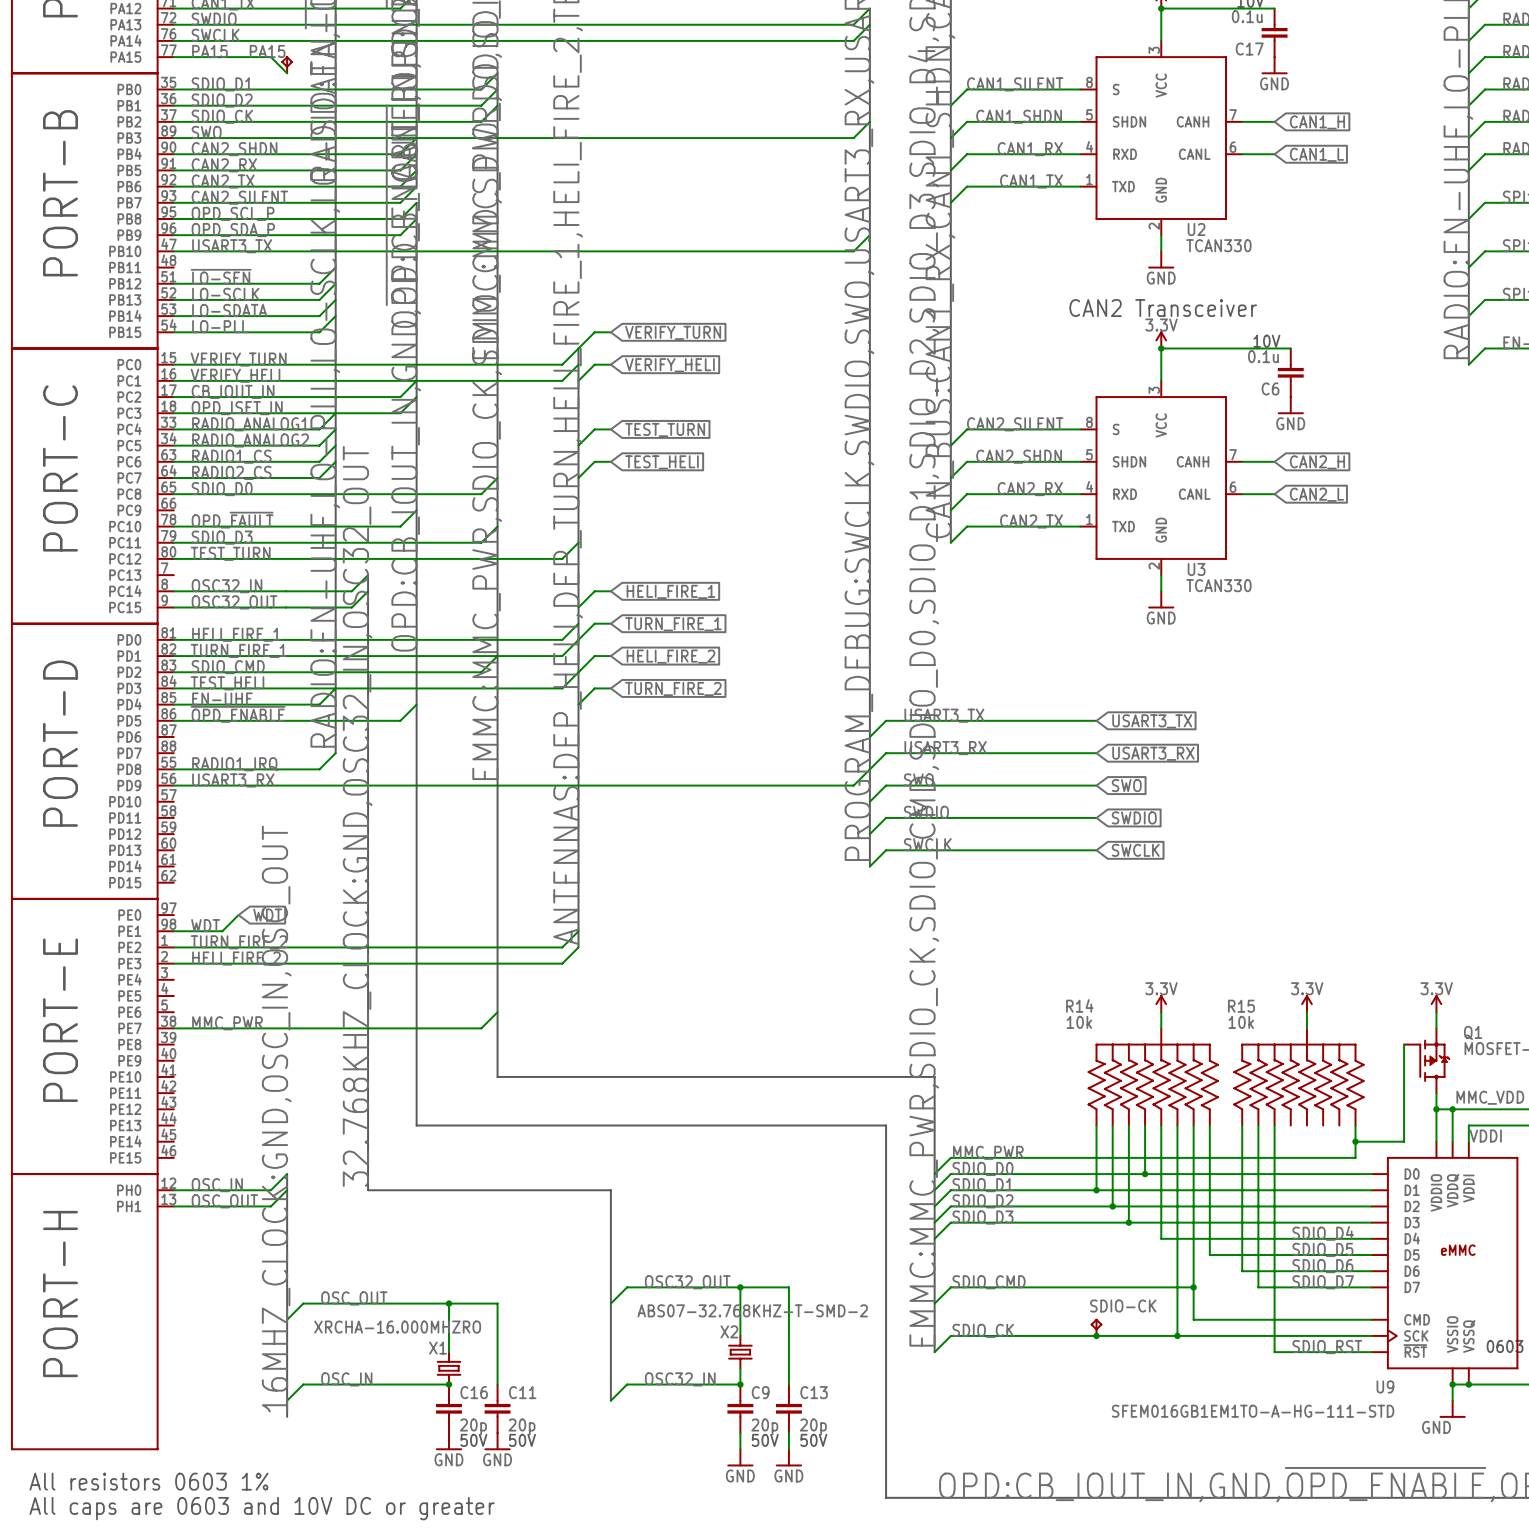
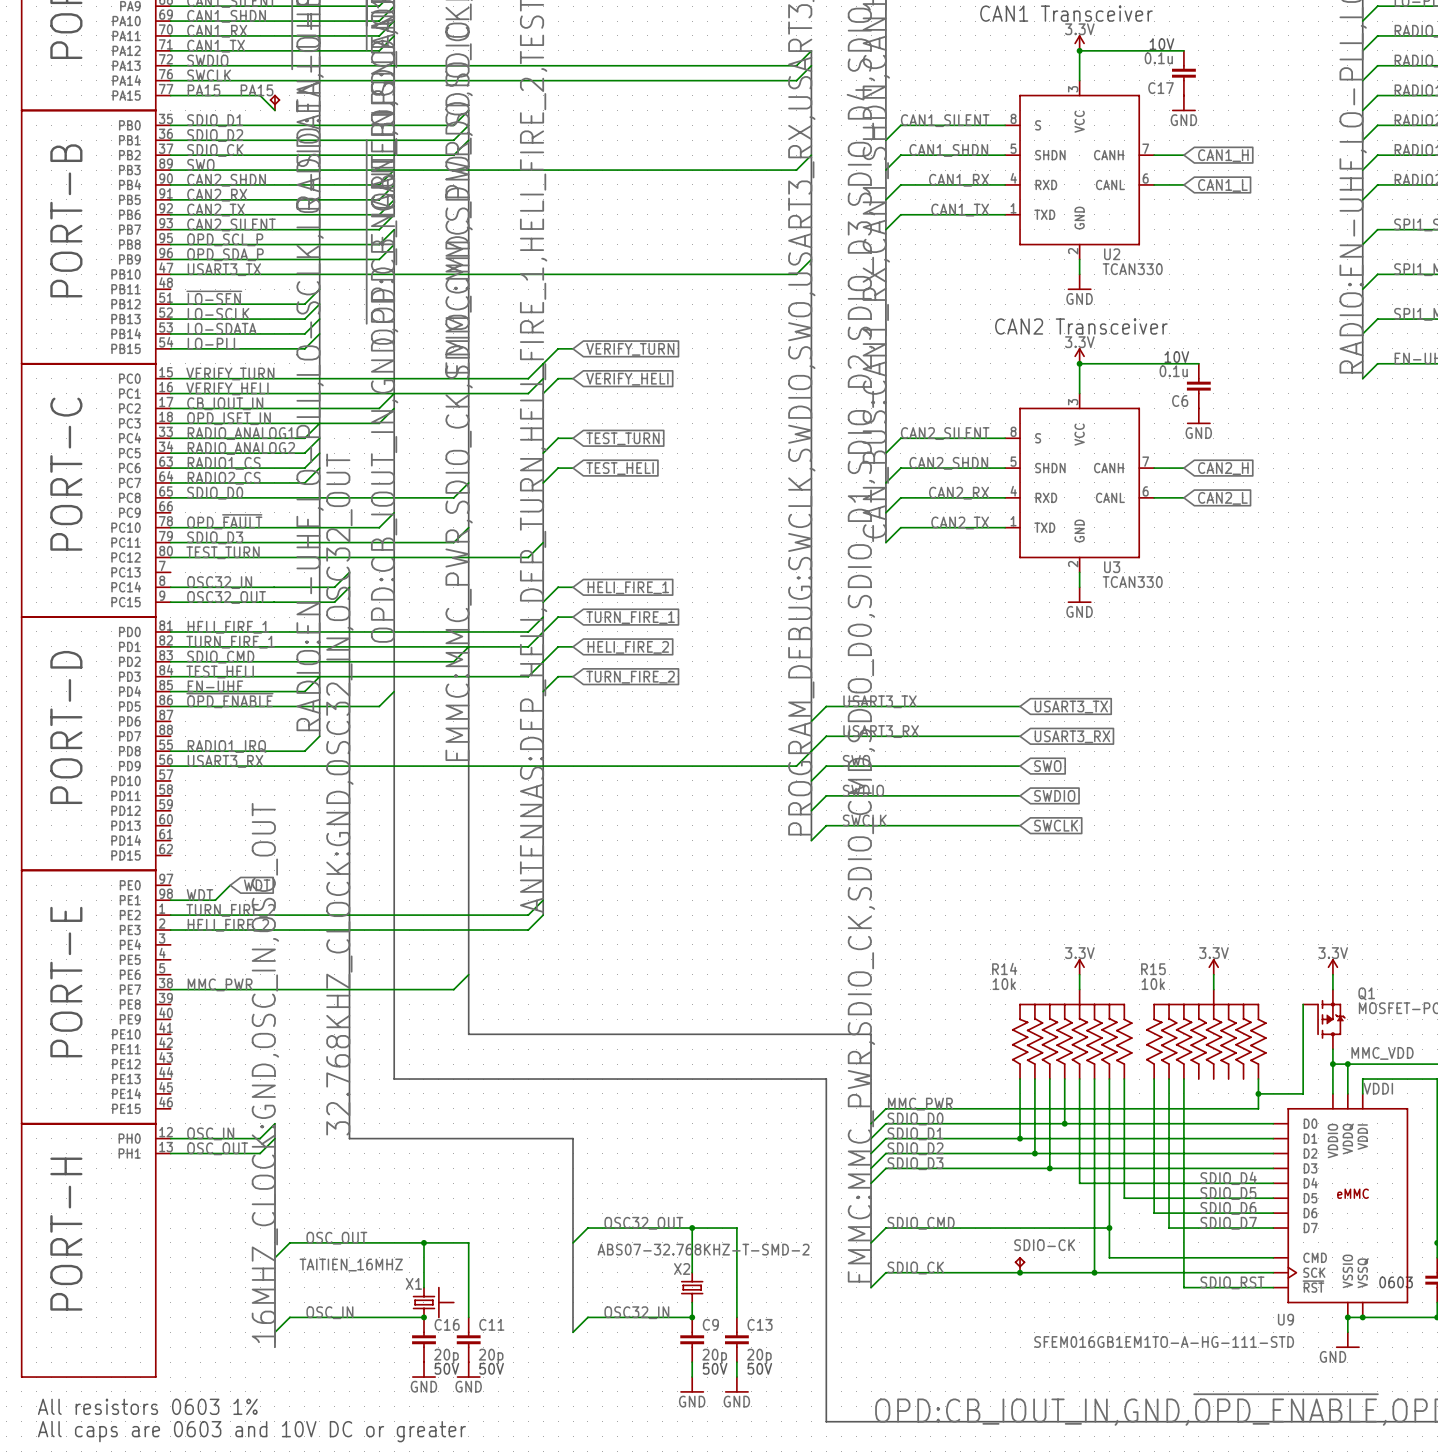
X1 value: XRCHA-16.000MHZRO (397, 1327) -> TAITIEN_16MHZ (351, 1265)
X1 symbol: [436, 1351, 462, 1386] -> [412, 1286, 454, 1319]

